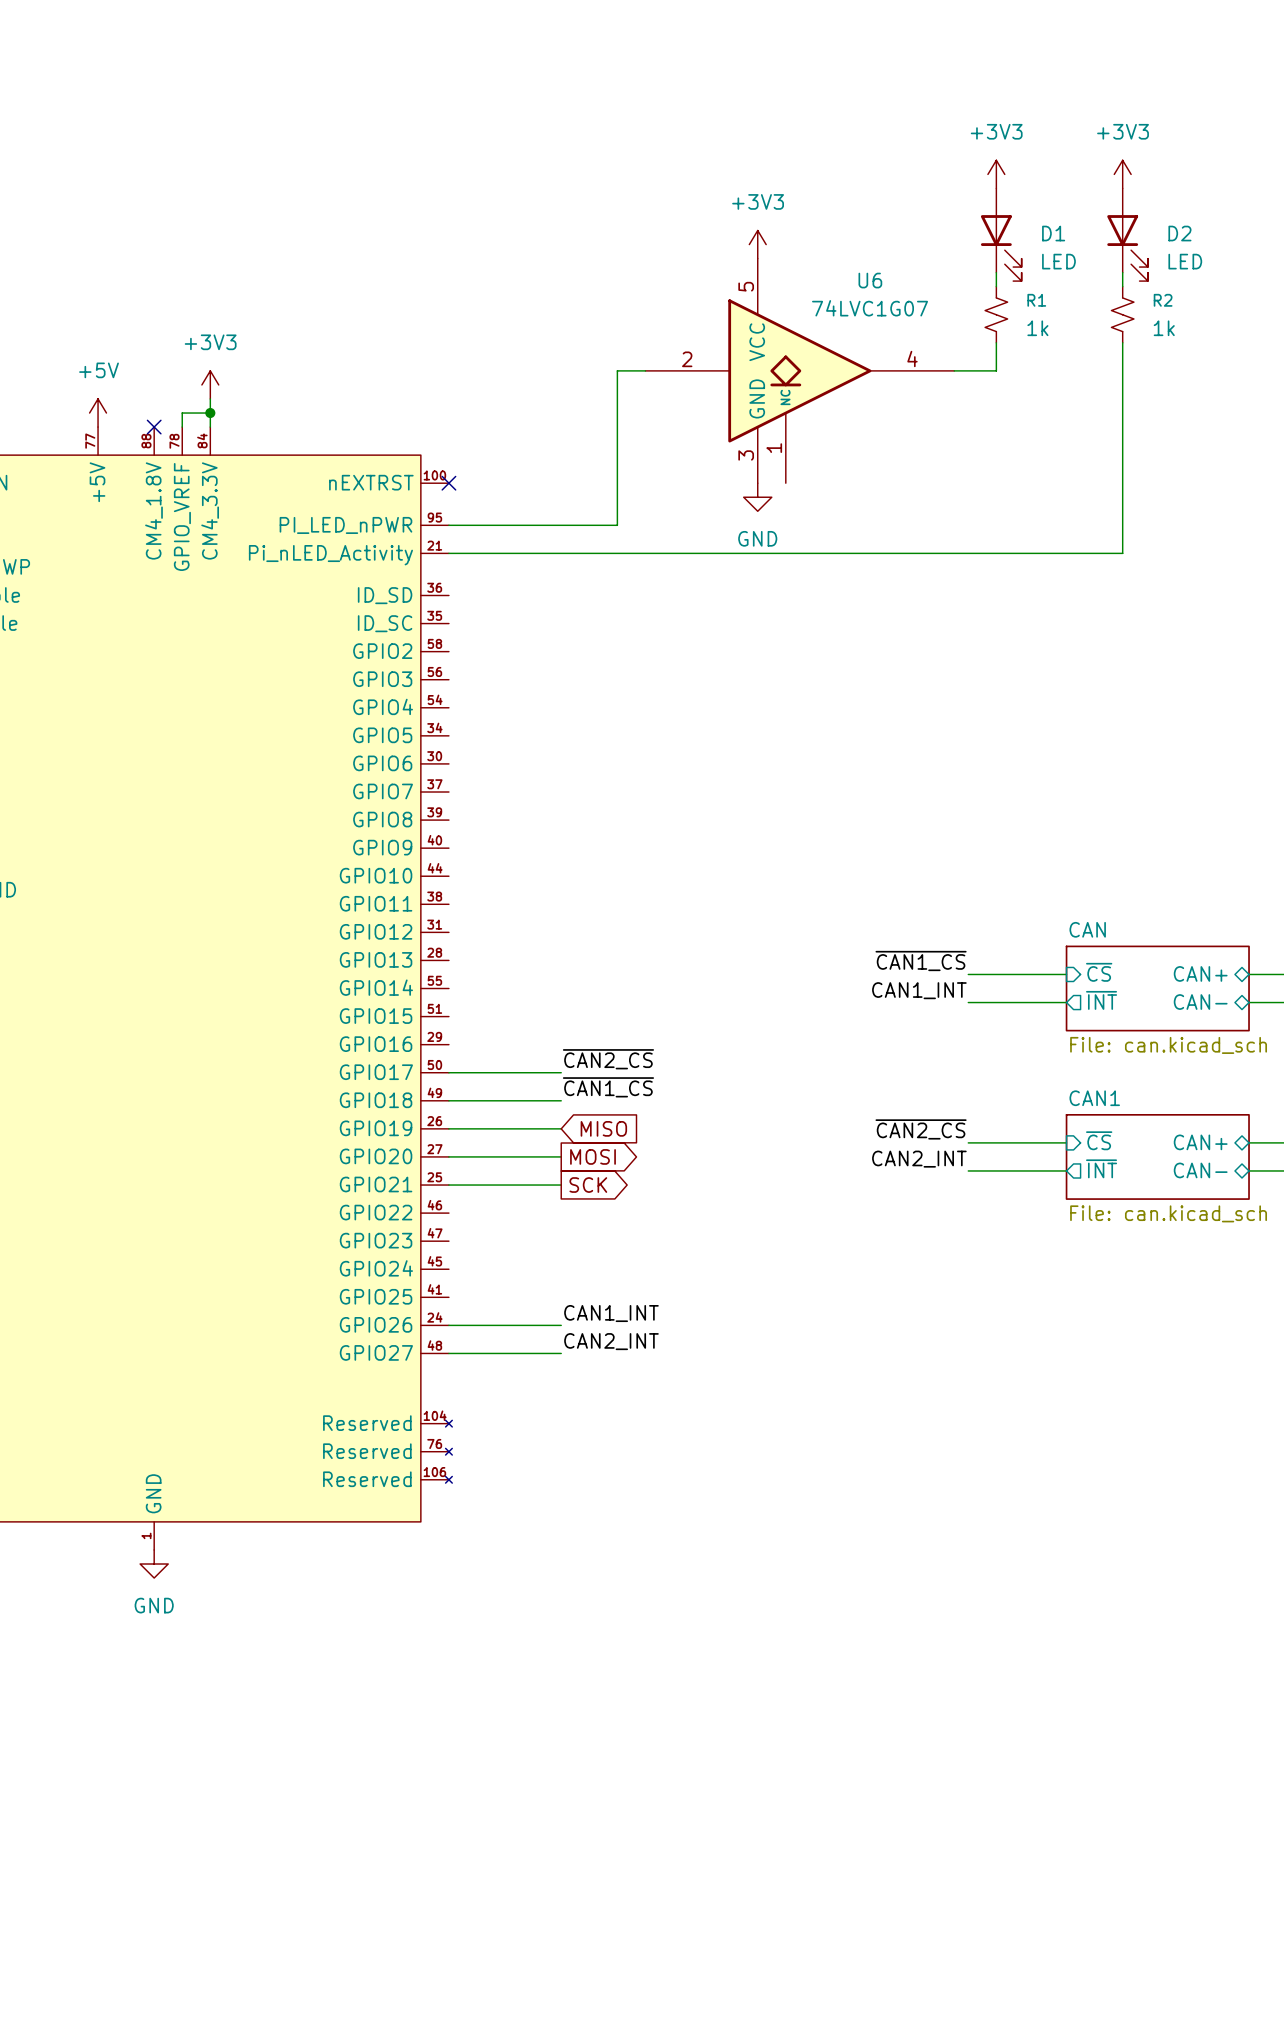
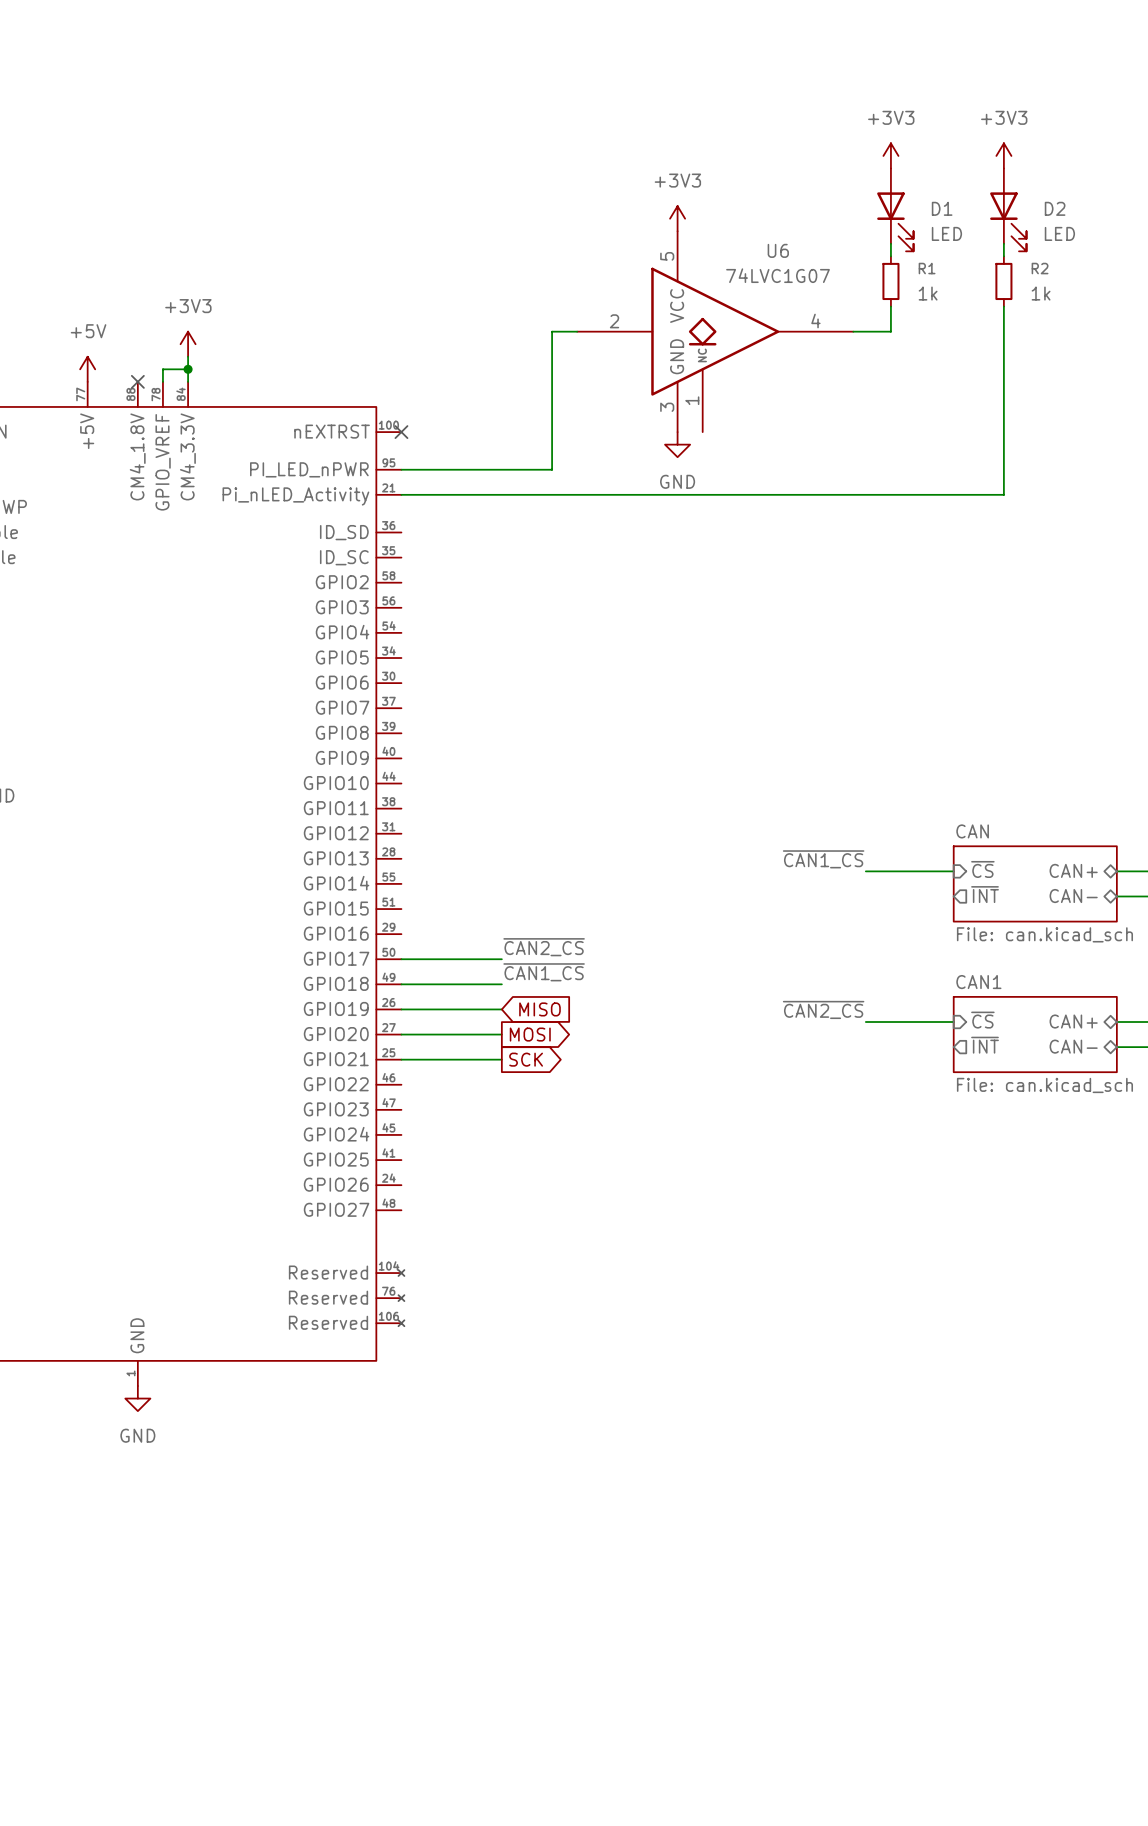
R1 symbol: [985, 286, 1008, 343] -> [882, 256, 900, 307]
R2 symbol: [1111, 286, 1134, 343] -> [995, 256, 1013, 307]
label: CAN1_INT (919, 990) -> none
wire: (968, 1002) (1066, 1002) -> none
label: CAN2_INT (919, 1159) -> none
wire: (968, 1170) (1066, 1170) -> none
label: CAN1_INT (611, 1313) -> none
wire: (448, 1325) (561, 1325) -> none
label: CAN2_INT (611, 1341) -> none
wire: (448, 1353) (561, 1353) -> none

